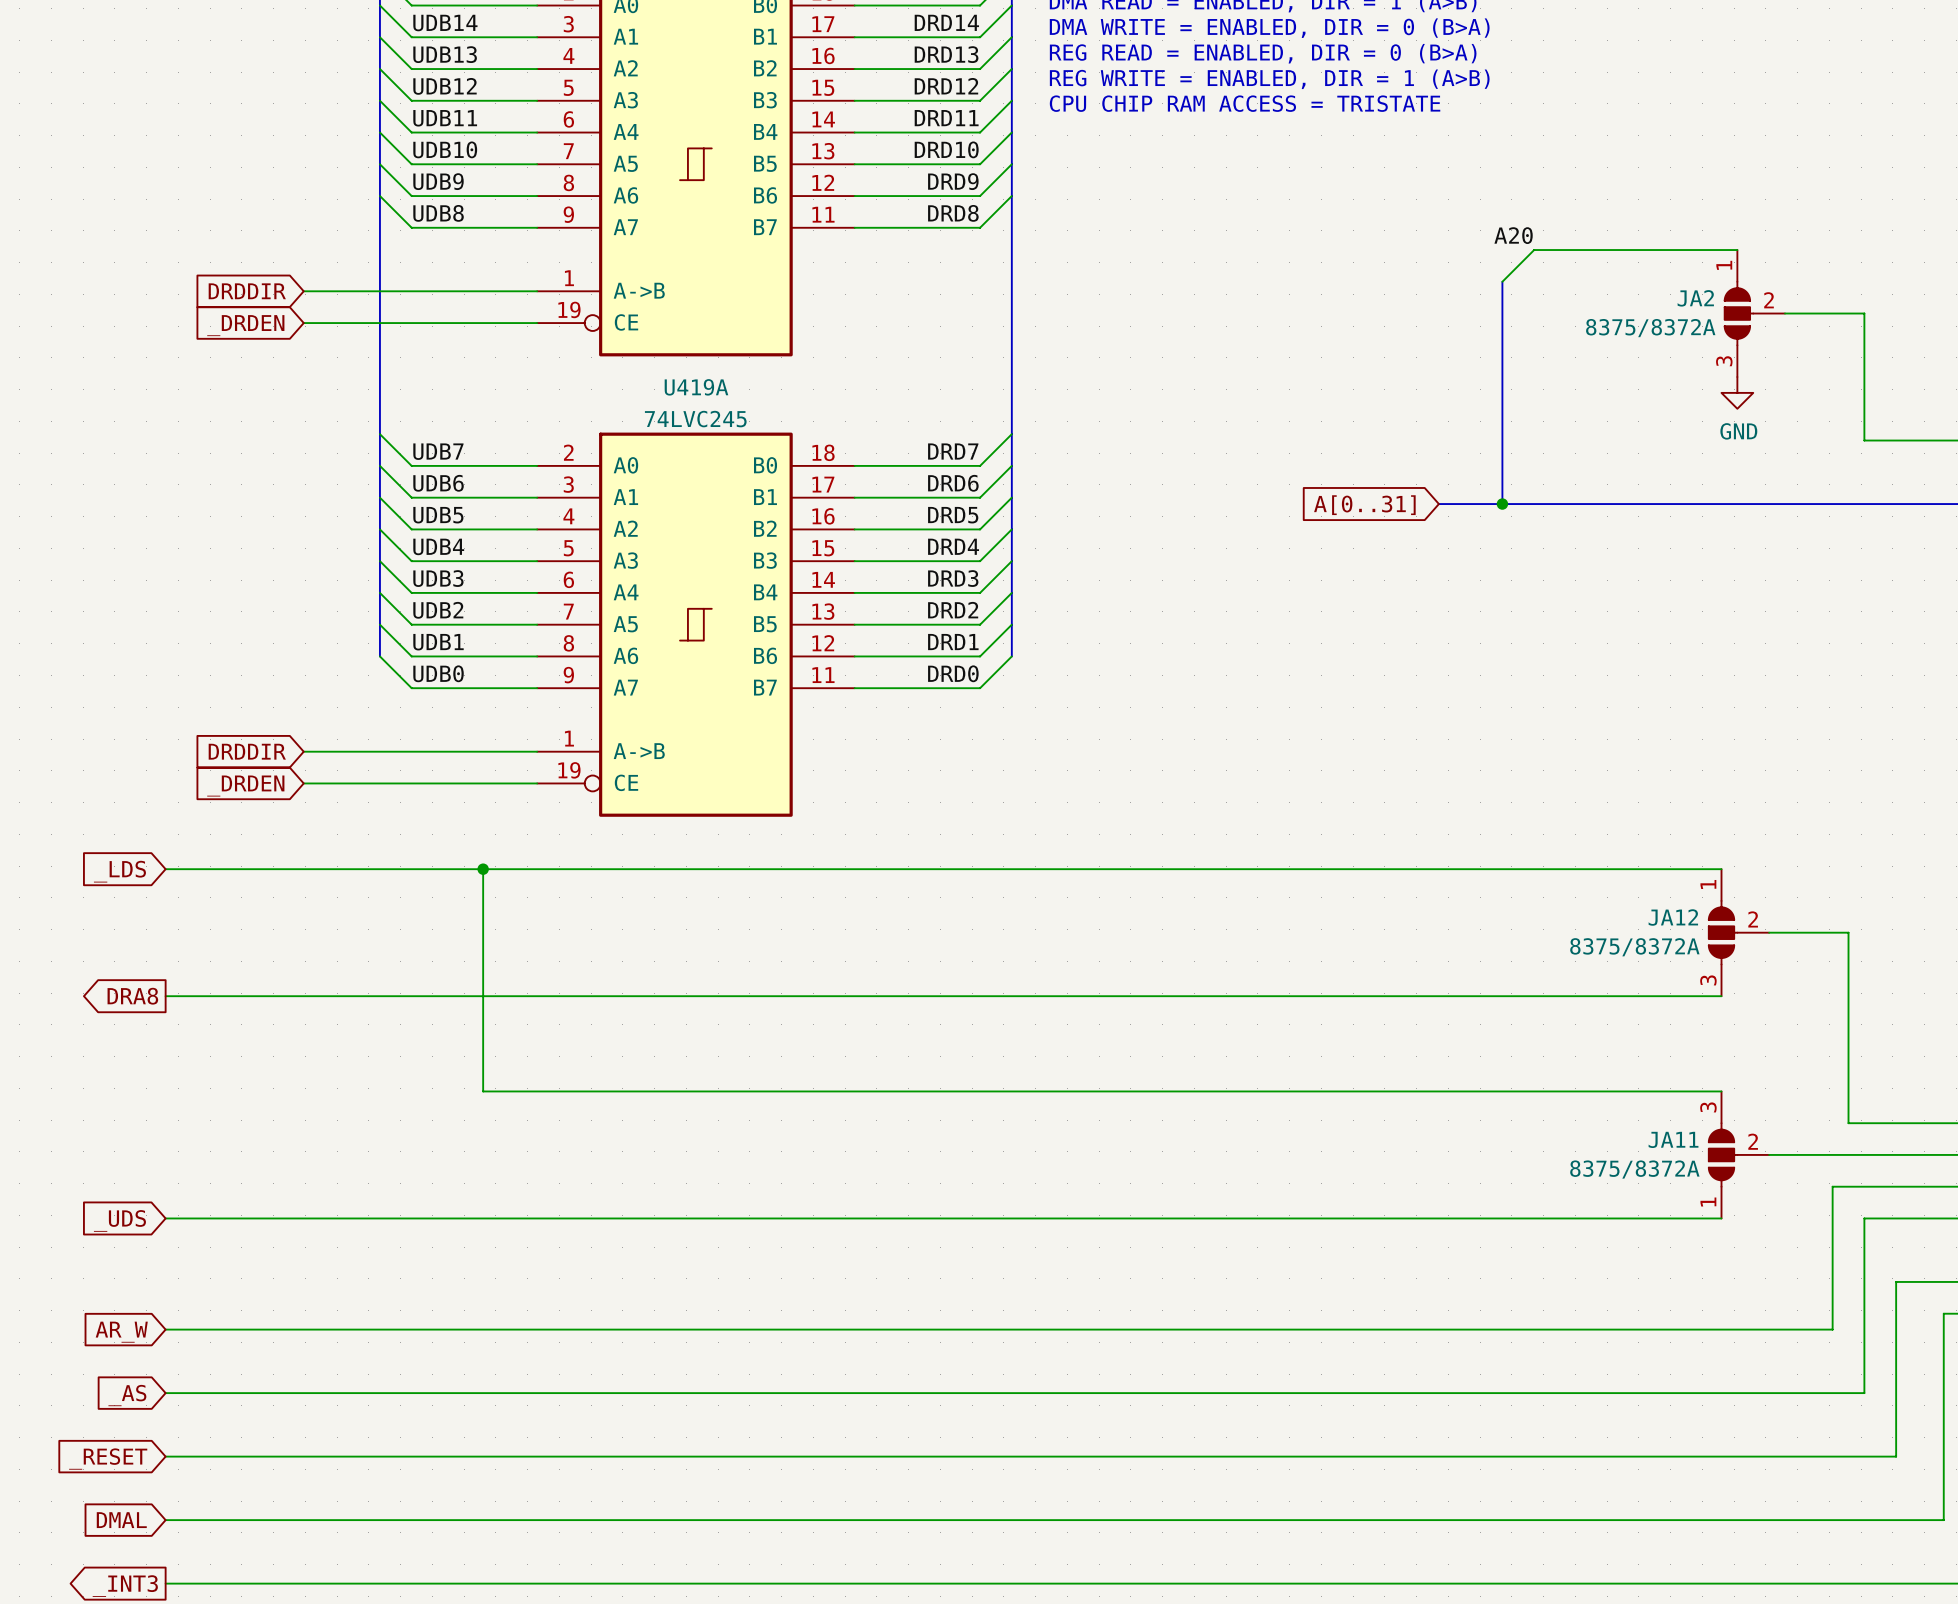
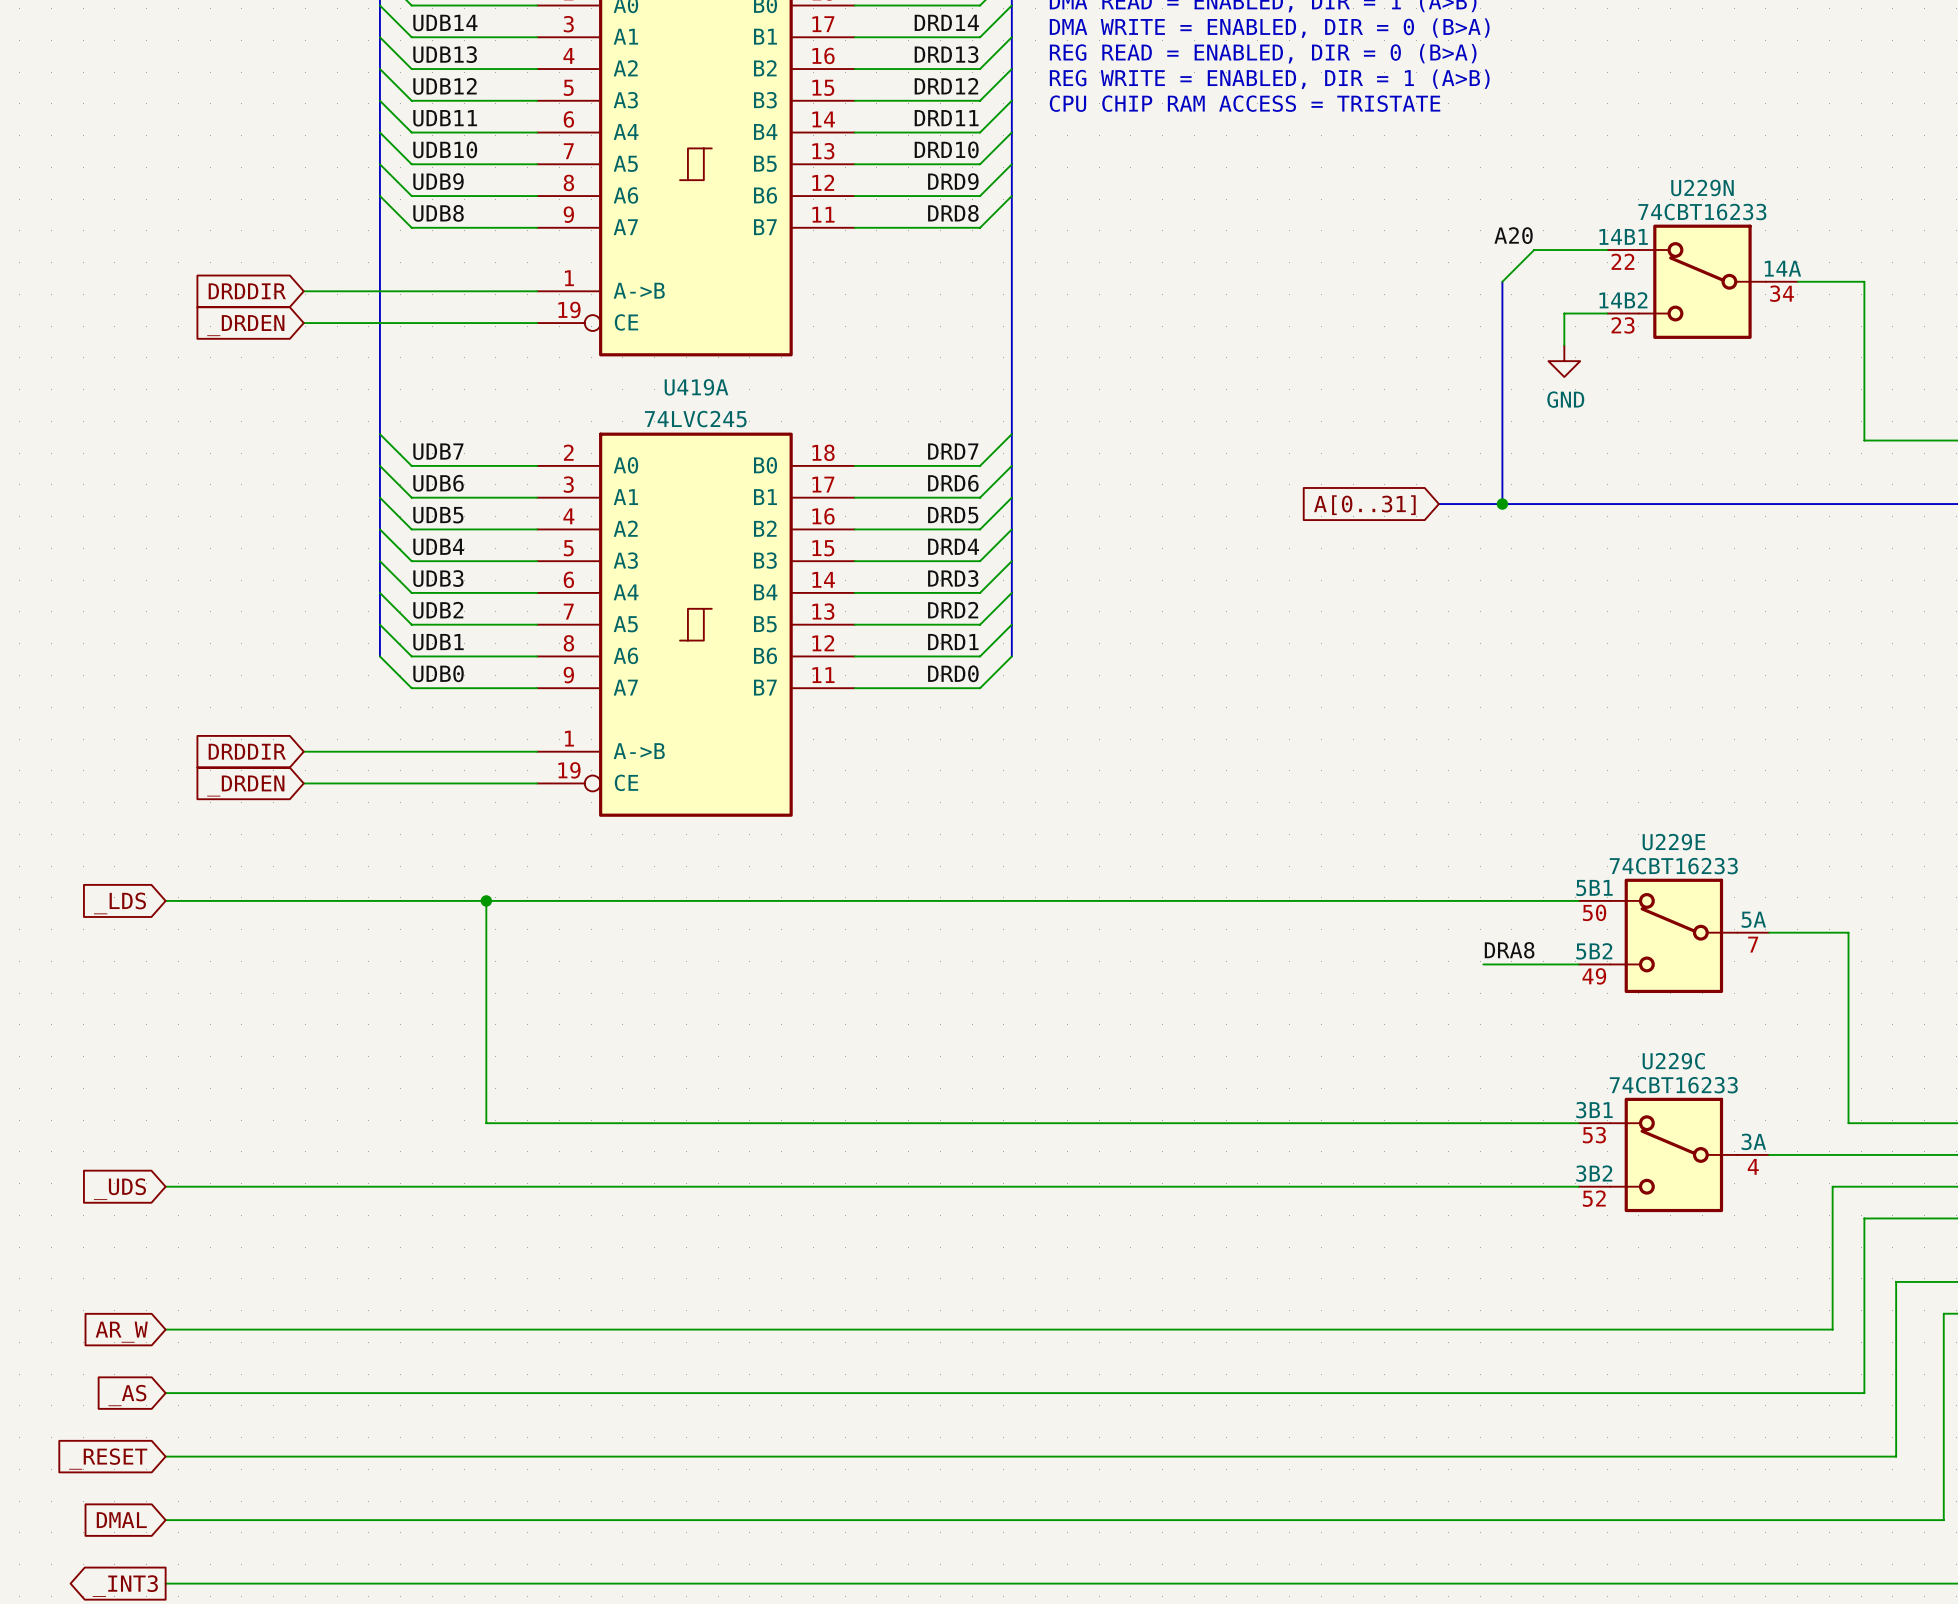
U229N: none -> 74CBT16233 (1702, 281)
wire: none -> (1607, 313) (1564, 313) (1564, 345)
JA2: 8375/8372A (1754, 313) -> none
wire: (1785, 313) (1864, 313) -> (1797, 281) (1864, 281) (1864, 313)
power symbol position: GND (1737, 392) -> GND (1564, 361)
wire: (165, 869) (1721, 869) -> none
wire: (483, 869) (483, 1091) (1721, 1091) -> none
junction position: (483, 869) -> (486, 900)
global label position: _LDS (119, 871) -> _LDS (119, 903)
wire: none -> (165, 900) (1578, 900)
wire: none -> (486, 900) (486, 1123) (1578, 1123)
JA12: 8375/8372A (1738, 932) -> none
U229E: none -> 74CBT16233 (1673, 935)
label: none -> DRA8 (1509, 950)
wire: none -> (1483, 964) (1578, 964)
global label: DRA8 (132, 996) -> none
wire: (165, 996) (1721, 996) -> none
U229C: none -> 74CBT16233 (1673, 1154)
JA11: 8375/8372A (1738, 1154) -> none
wire: none -> (165, 1186) (1578, 1186)
wire: (165, 1218) (1721, 1218) -> none
global label position: _UDS (119, 1220) -> _UDS (119, 1189)

